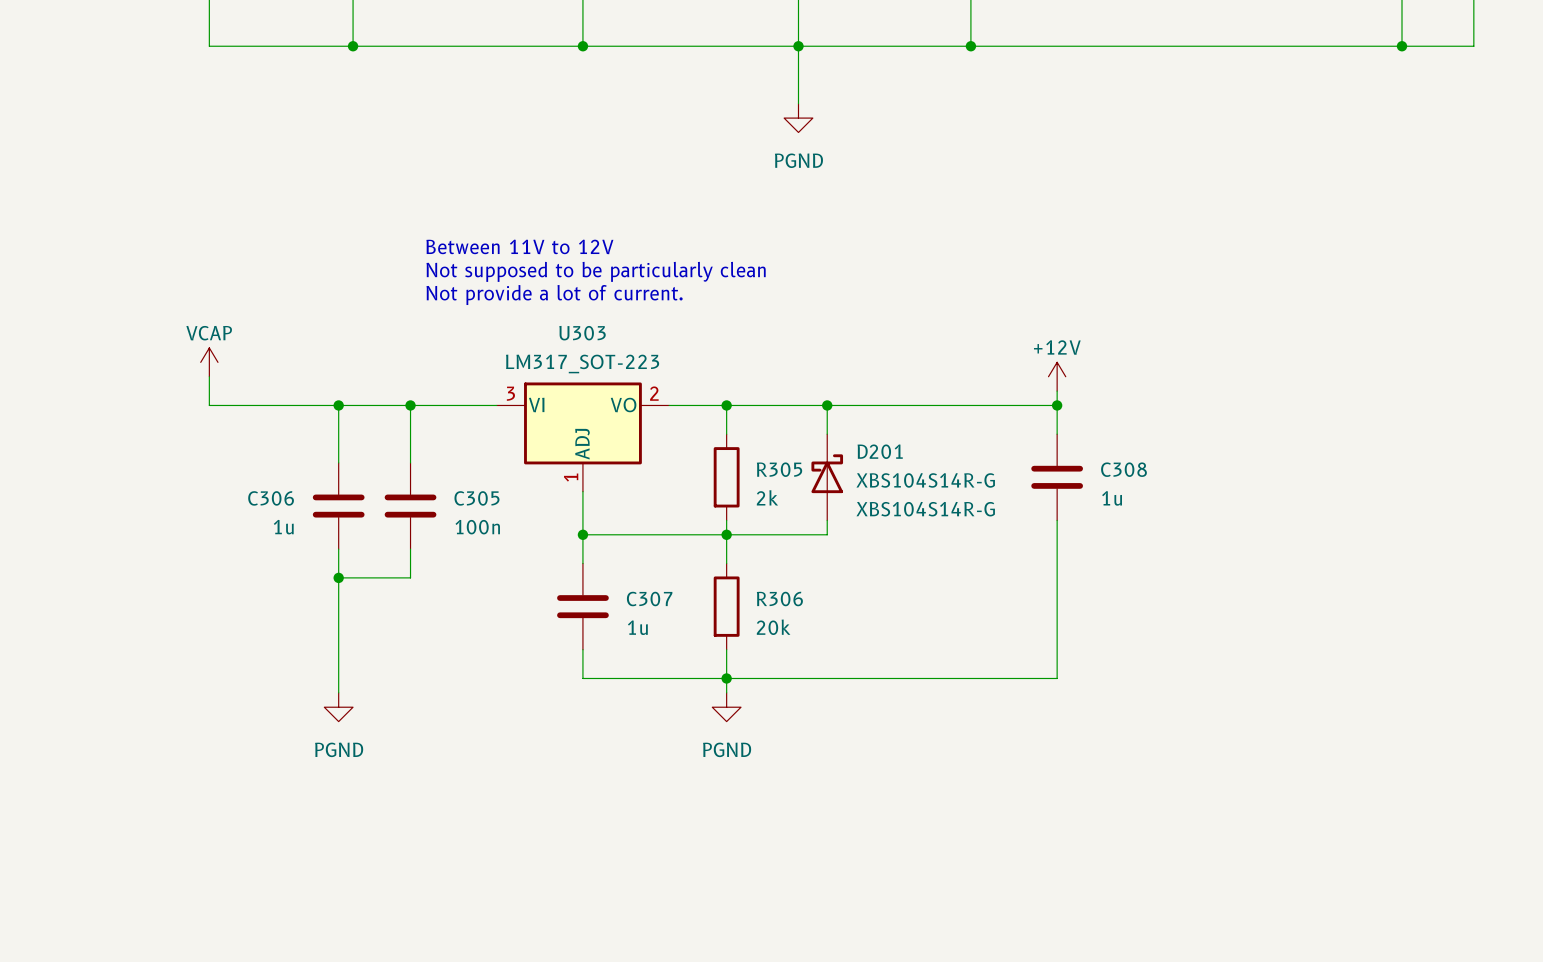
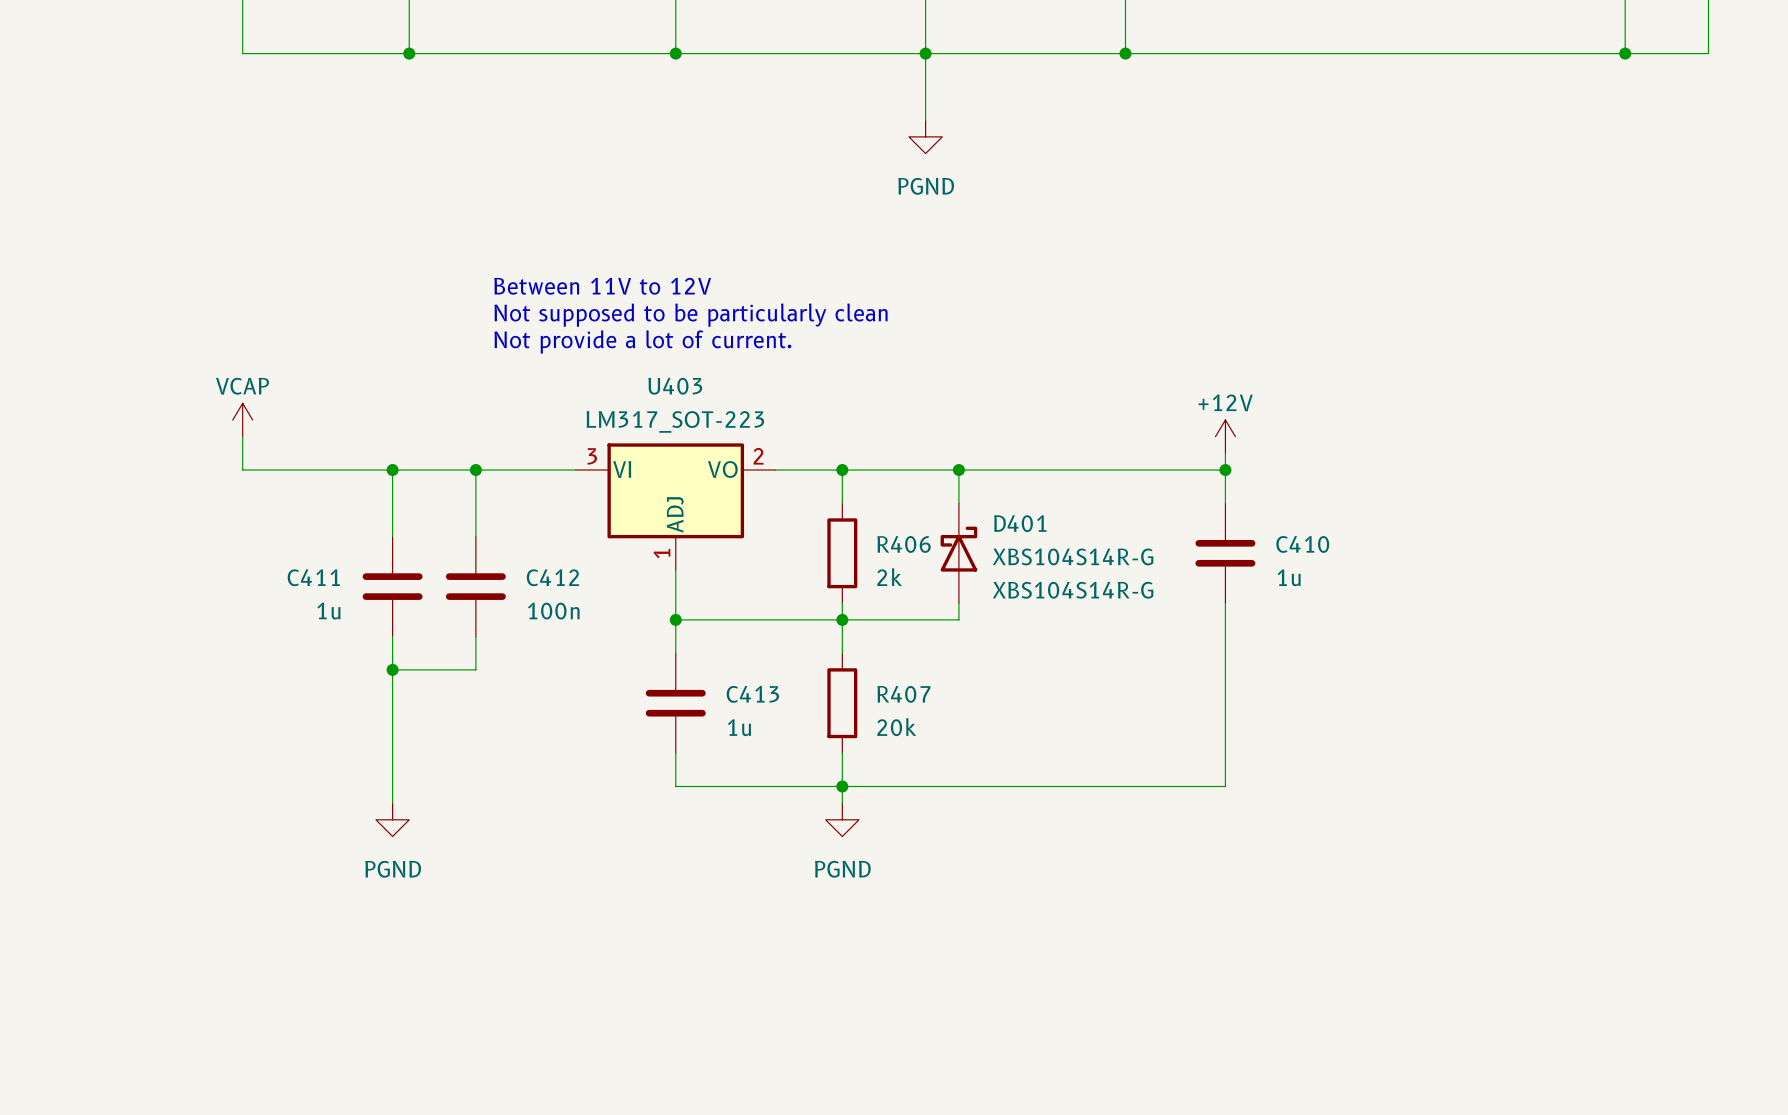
U303 name: U303 (582, 333) -> U403 (675, 386)
D201 name: D201 (880, 451) -> D401 (1020, 523)
R305 name: R305 (779, 469) -> R406 (904, 544)
C308 name: C308 (1123, 469) -> C410 (1302, 544)
C306 name: C306 (271, 498) -> C411 (313, 577)
C305 name: C305 (476, 498) -> C412 (552, 577)
C307 name: C307 (649, 599) -> C413 (752, 694)
R306 name: R306 (779, 599) -> R407 (903, 694)

